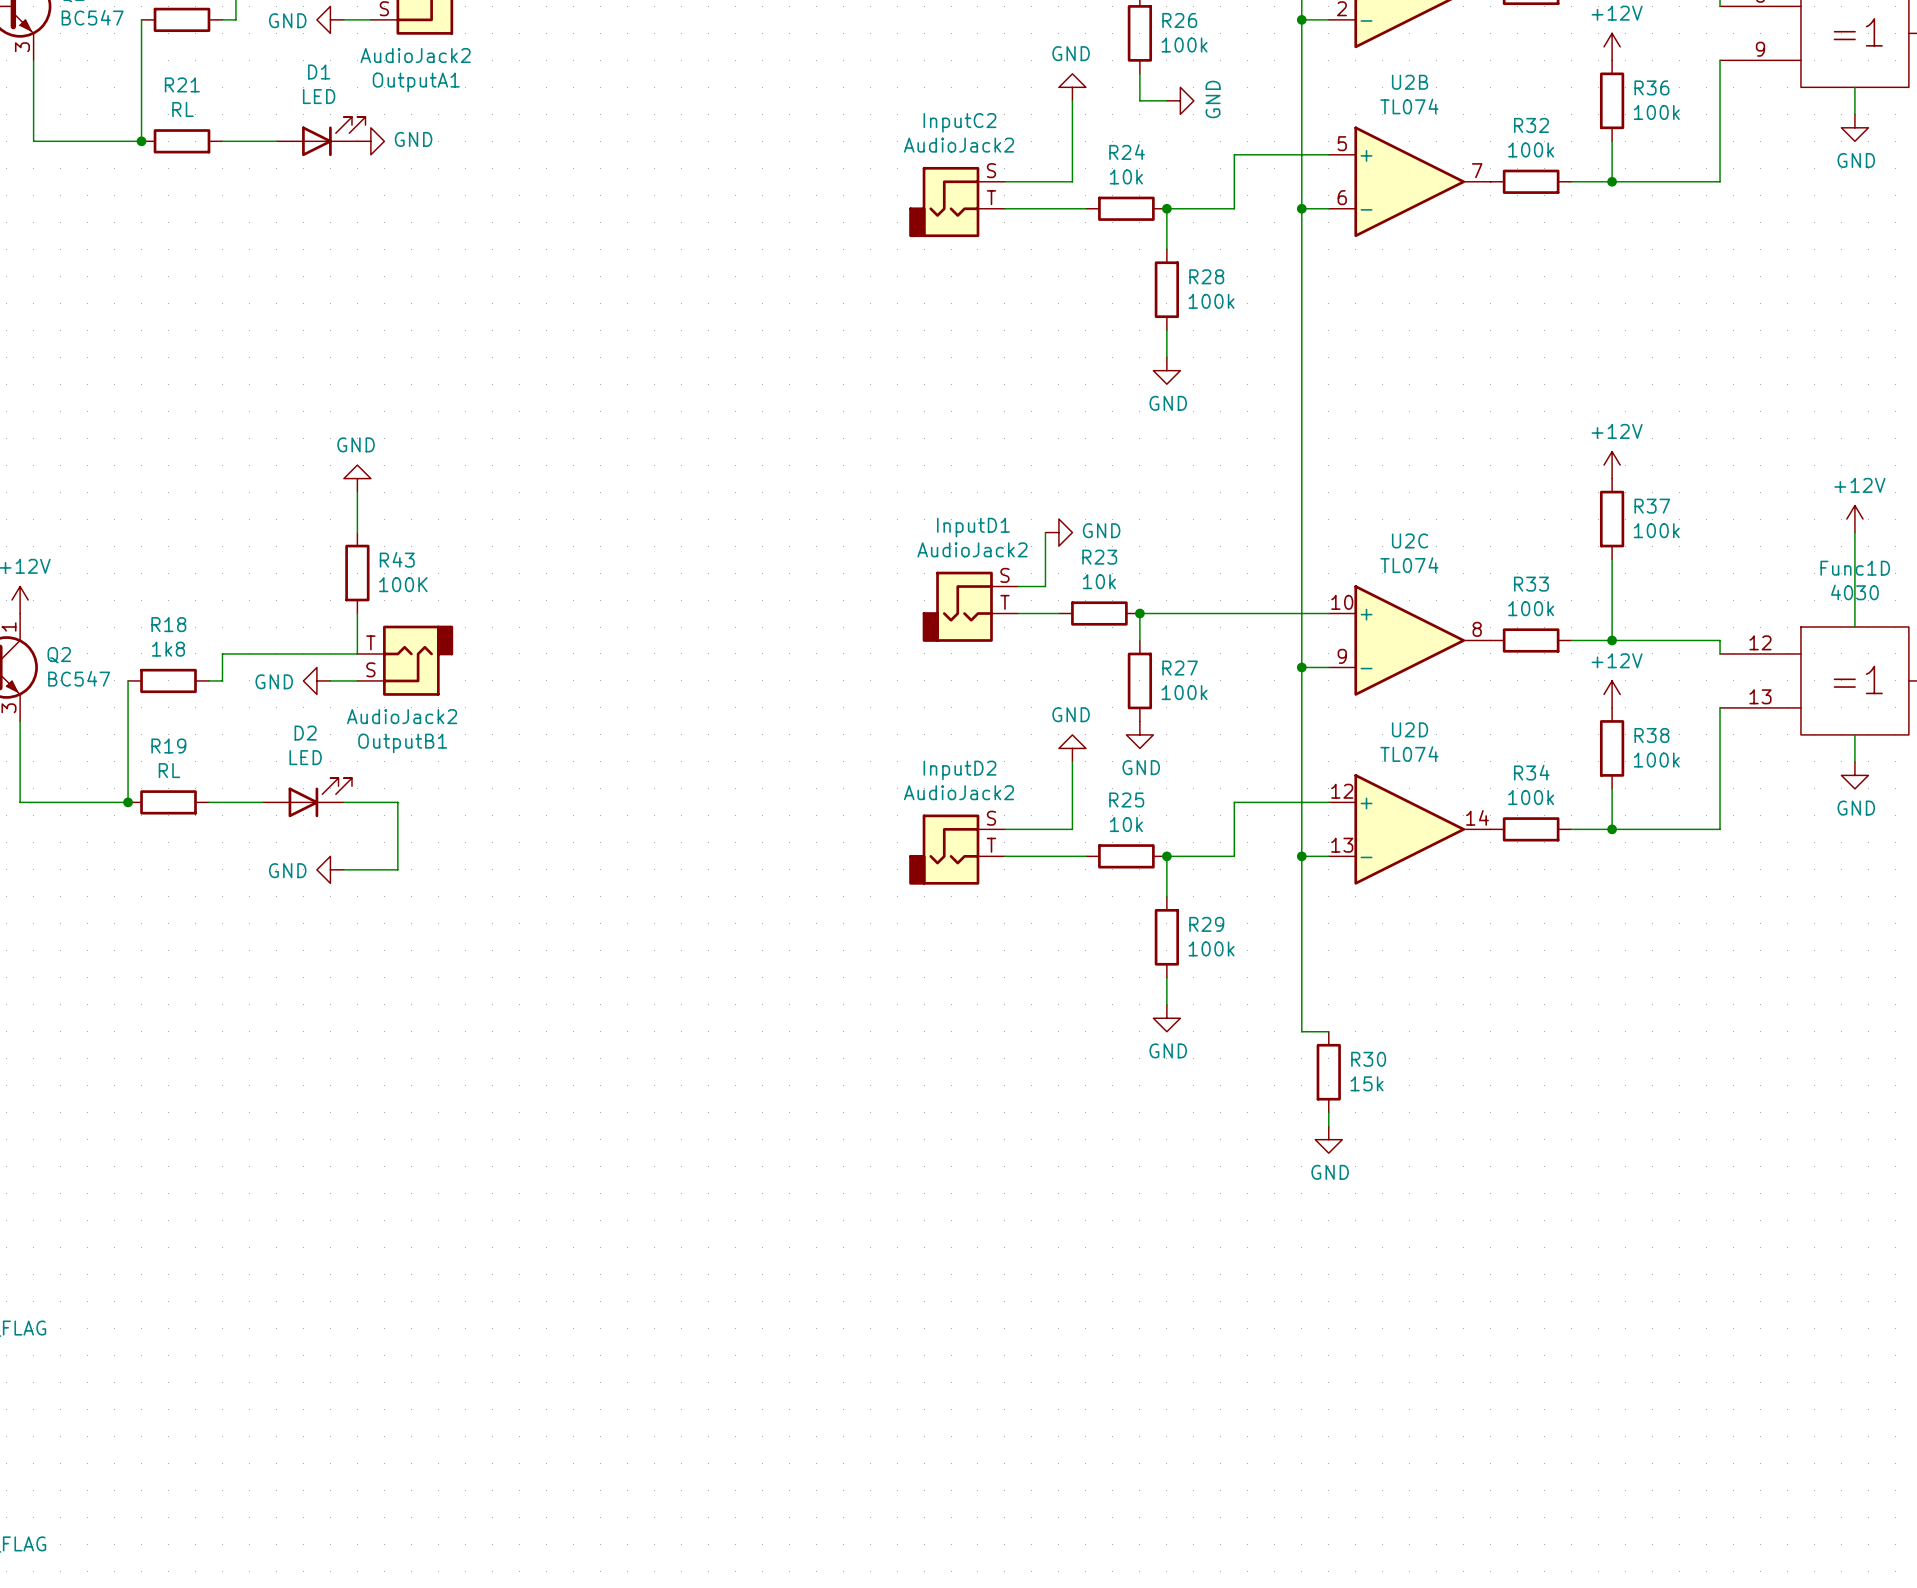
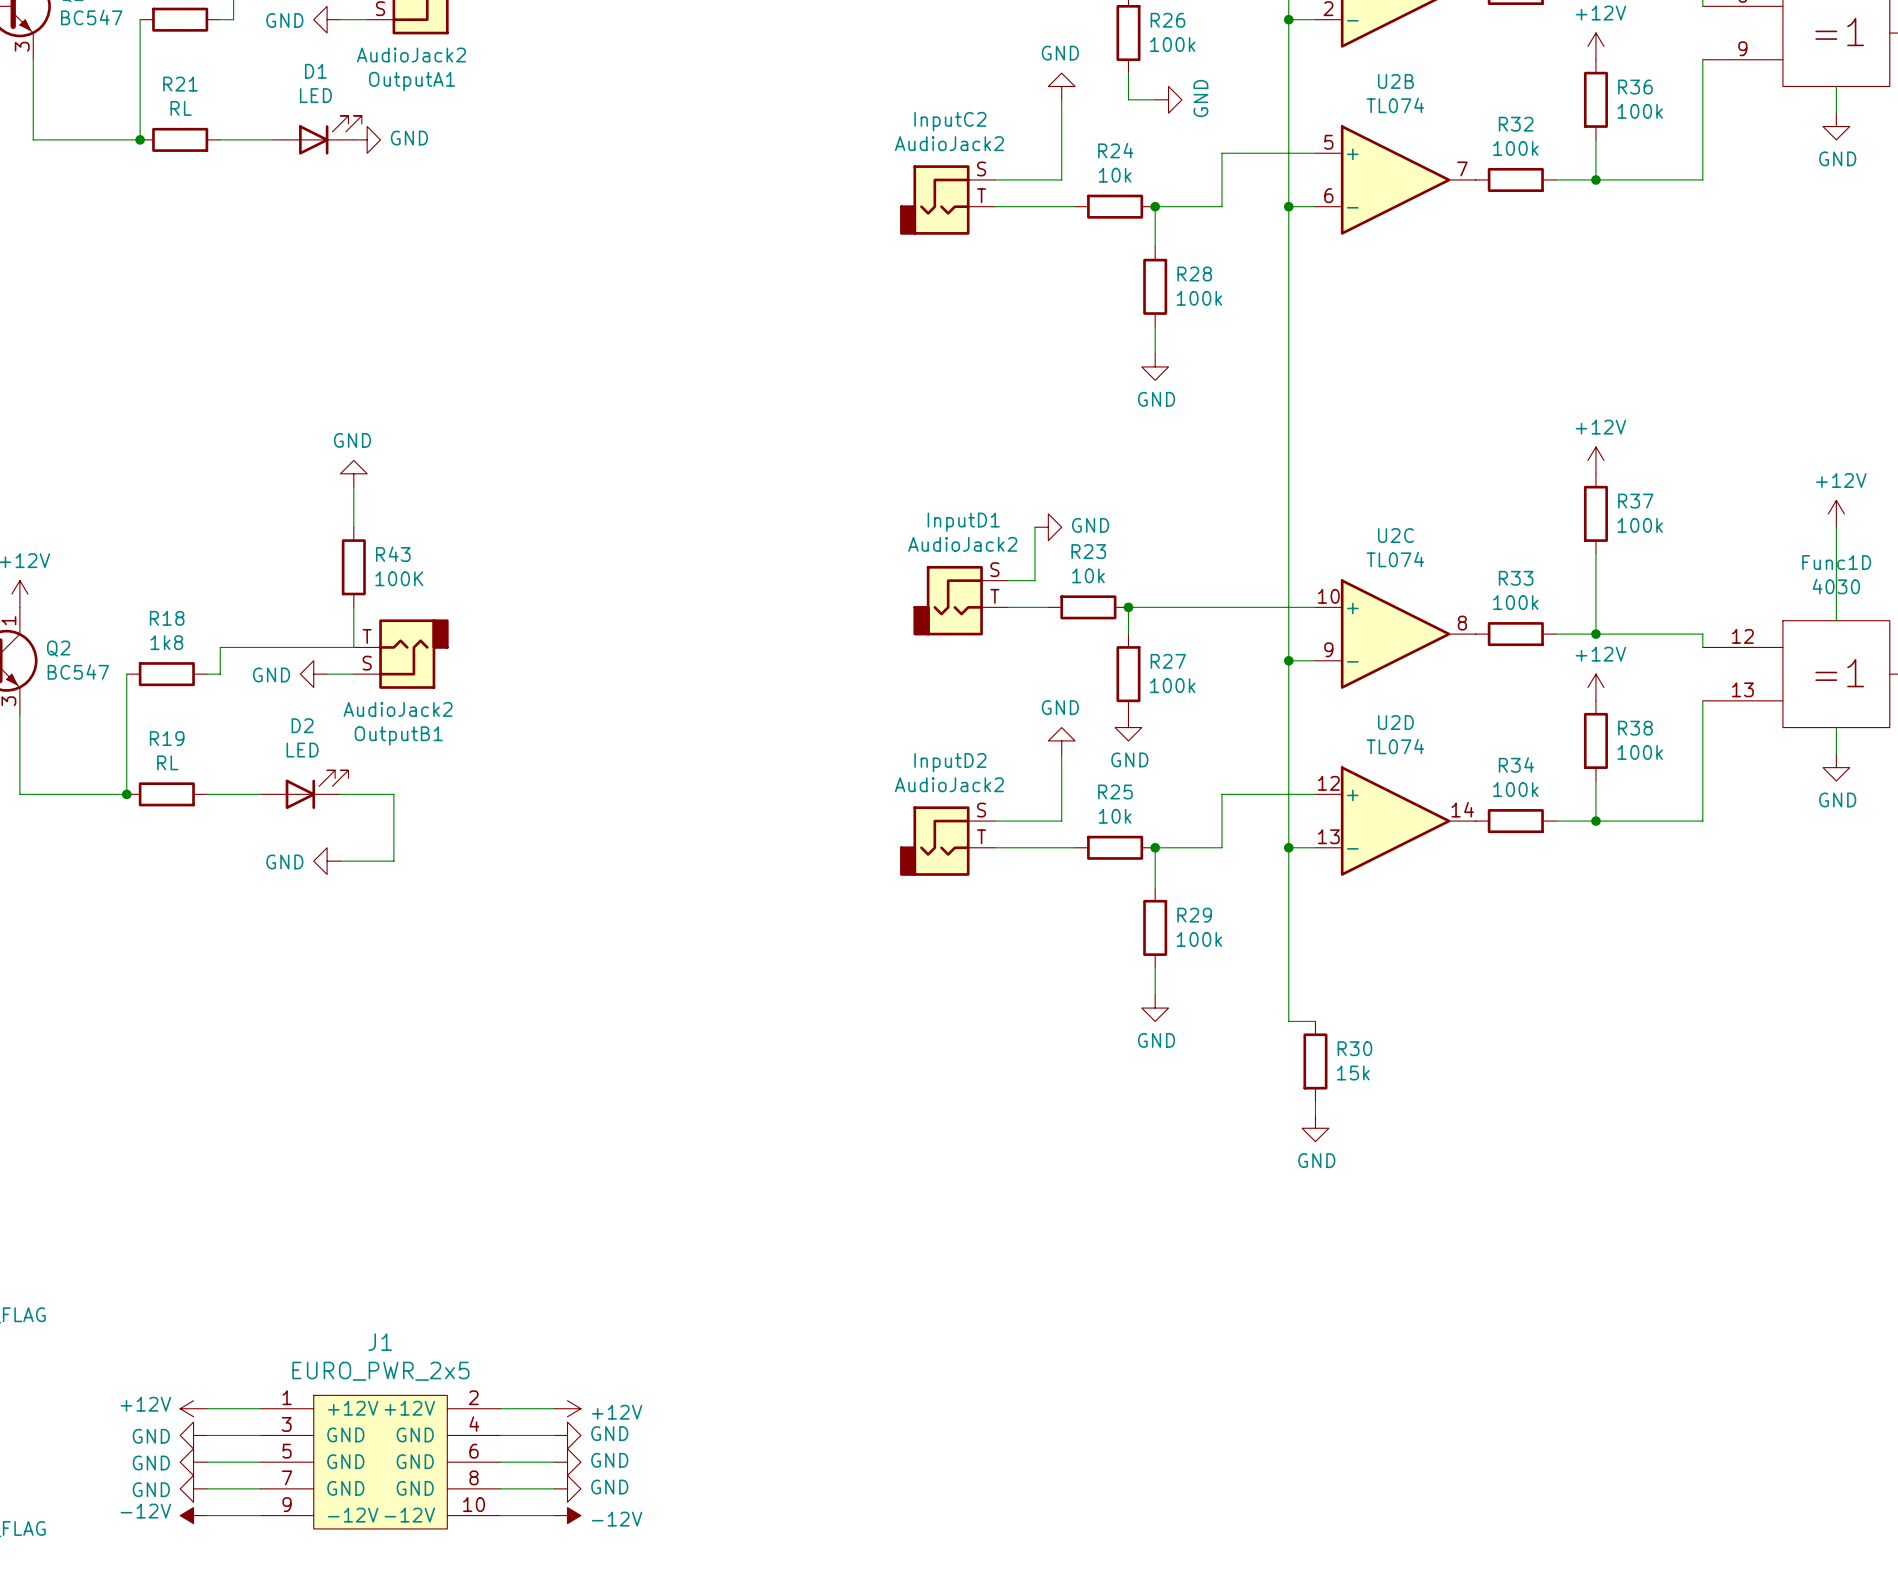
power symbol: none -> +12V (193, 1408)
wire: none -> (206, 1408) (260, 1408)
wire: none -> (500, 1408) (554, 1408)
power symbol: none -> +12V (567, 1408)
power symbol: none -> GND (193, 1435)
wire: none -> (206, 1435) (260, 1435)
wire: none -> (500, 1435) (554, 1435)
power symbol: none -> GND (567, 1435)
power symbol: none -> GND (193, 1462)
wire: none -> (206, 1462) (260, 1462)
J1: none -> EURO_PWR_2x5 (380, 1462)
wire: none -> (500, 1462) (554, 1462)
power symbol: none -> GND (567, 1462)
power symbol: none -> GND (193, 1488)
wire: none -> (206, 1488) (260, 1488)
wire: none -> (500, 1488) (554, 1488)
power symbol: none -> GND (567, 1488)
power symbol: none -> -12V (193, 1515)
wire: none -> (206, 1515) (260, 1515)
wire: none -> (500, 1515) (554, 1515)
power symbol: none -> -12V (567, 1515)

